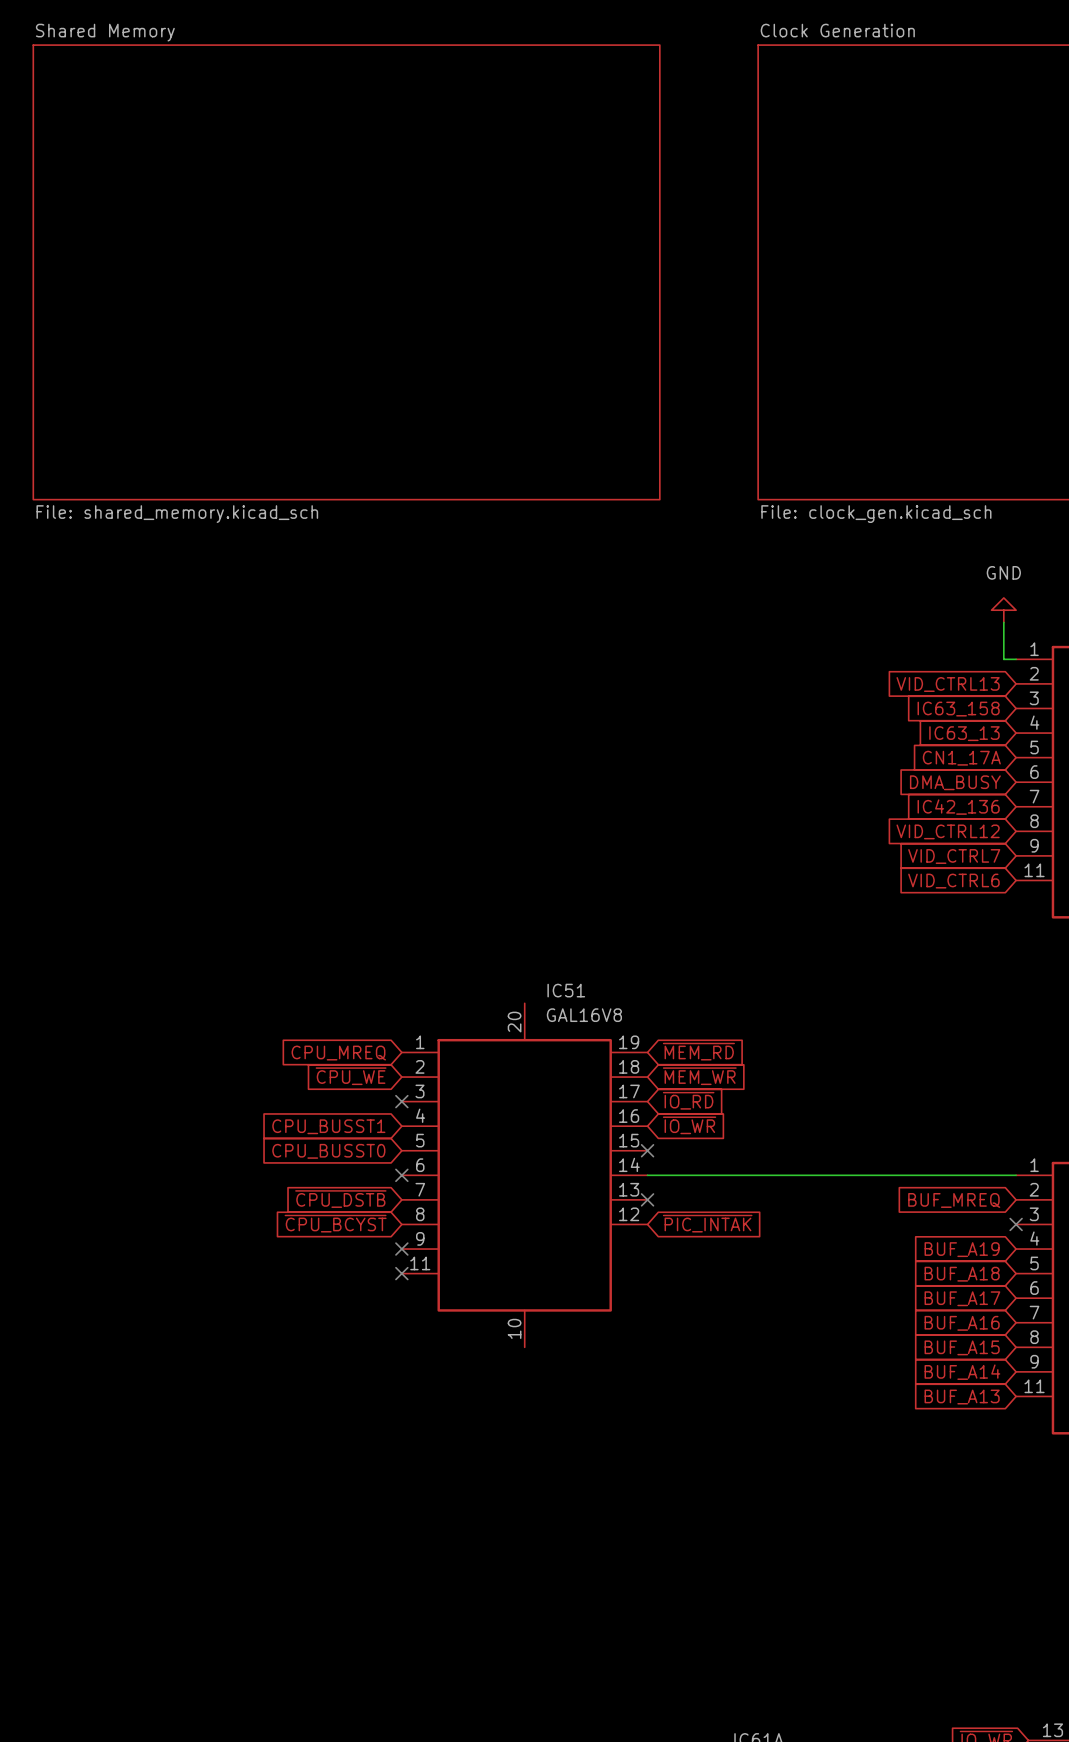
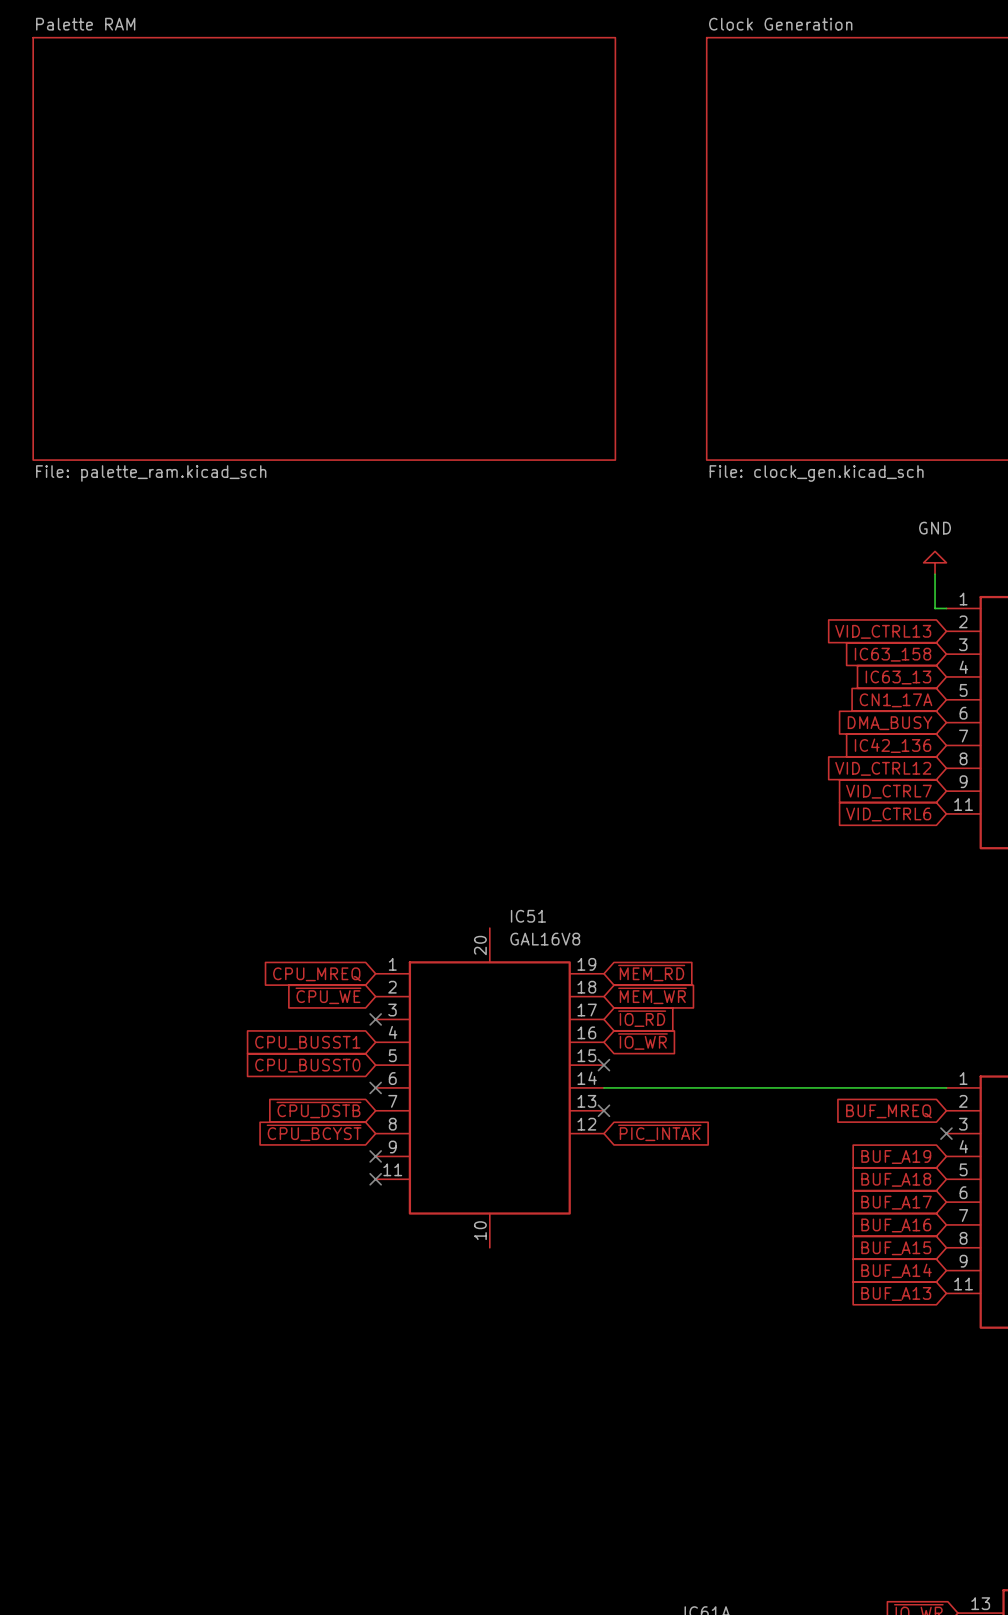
sheet Shared Memory name: Shared Memory (105, 32) -> Palette RAM (85, 24)
sheet Shared Memory value: File: shared_memory.kicad_sch (177, 514) -> File: palette_ram.kicad_sch (151, 473)

